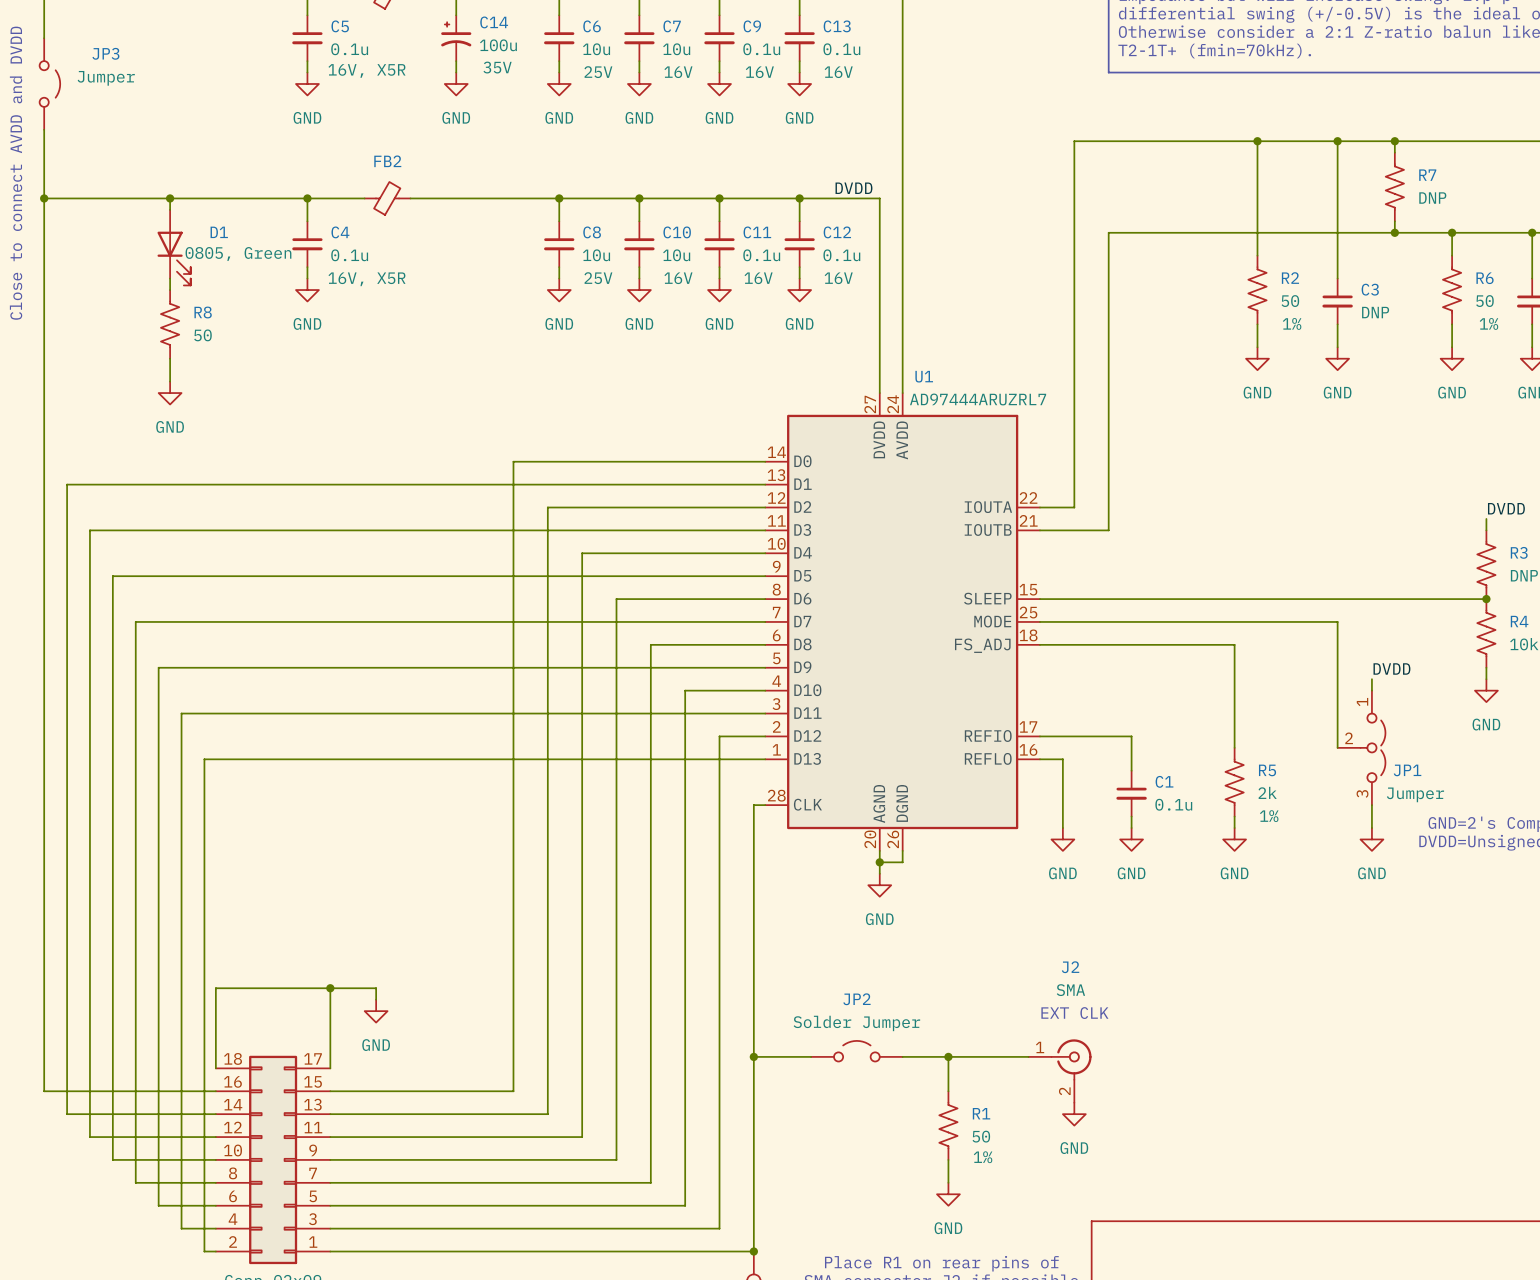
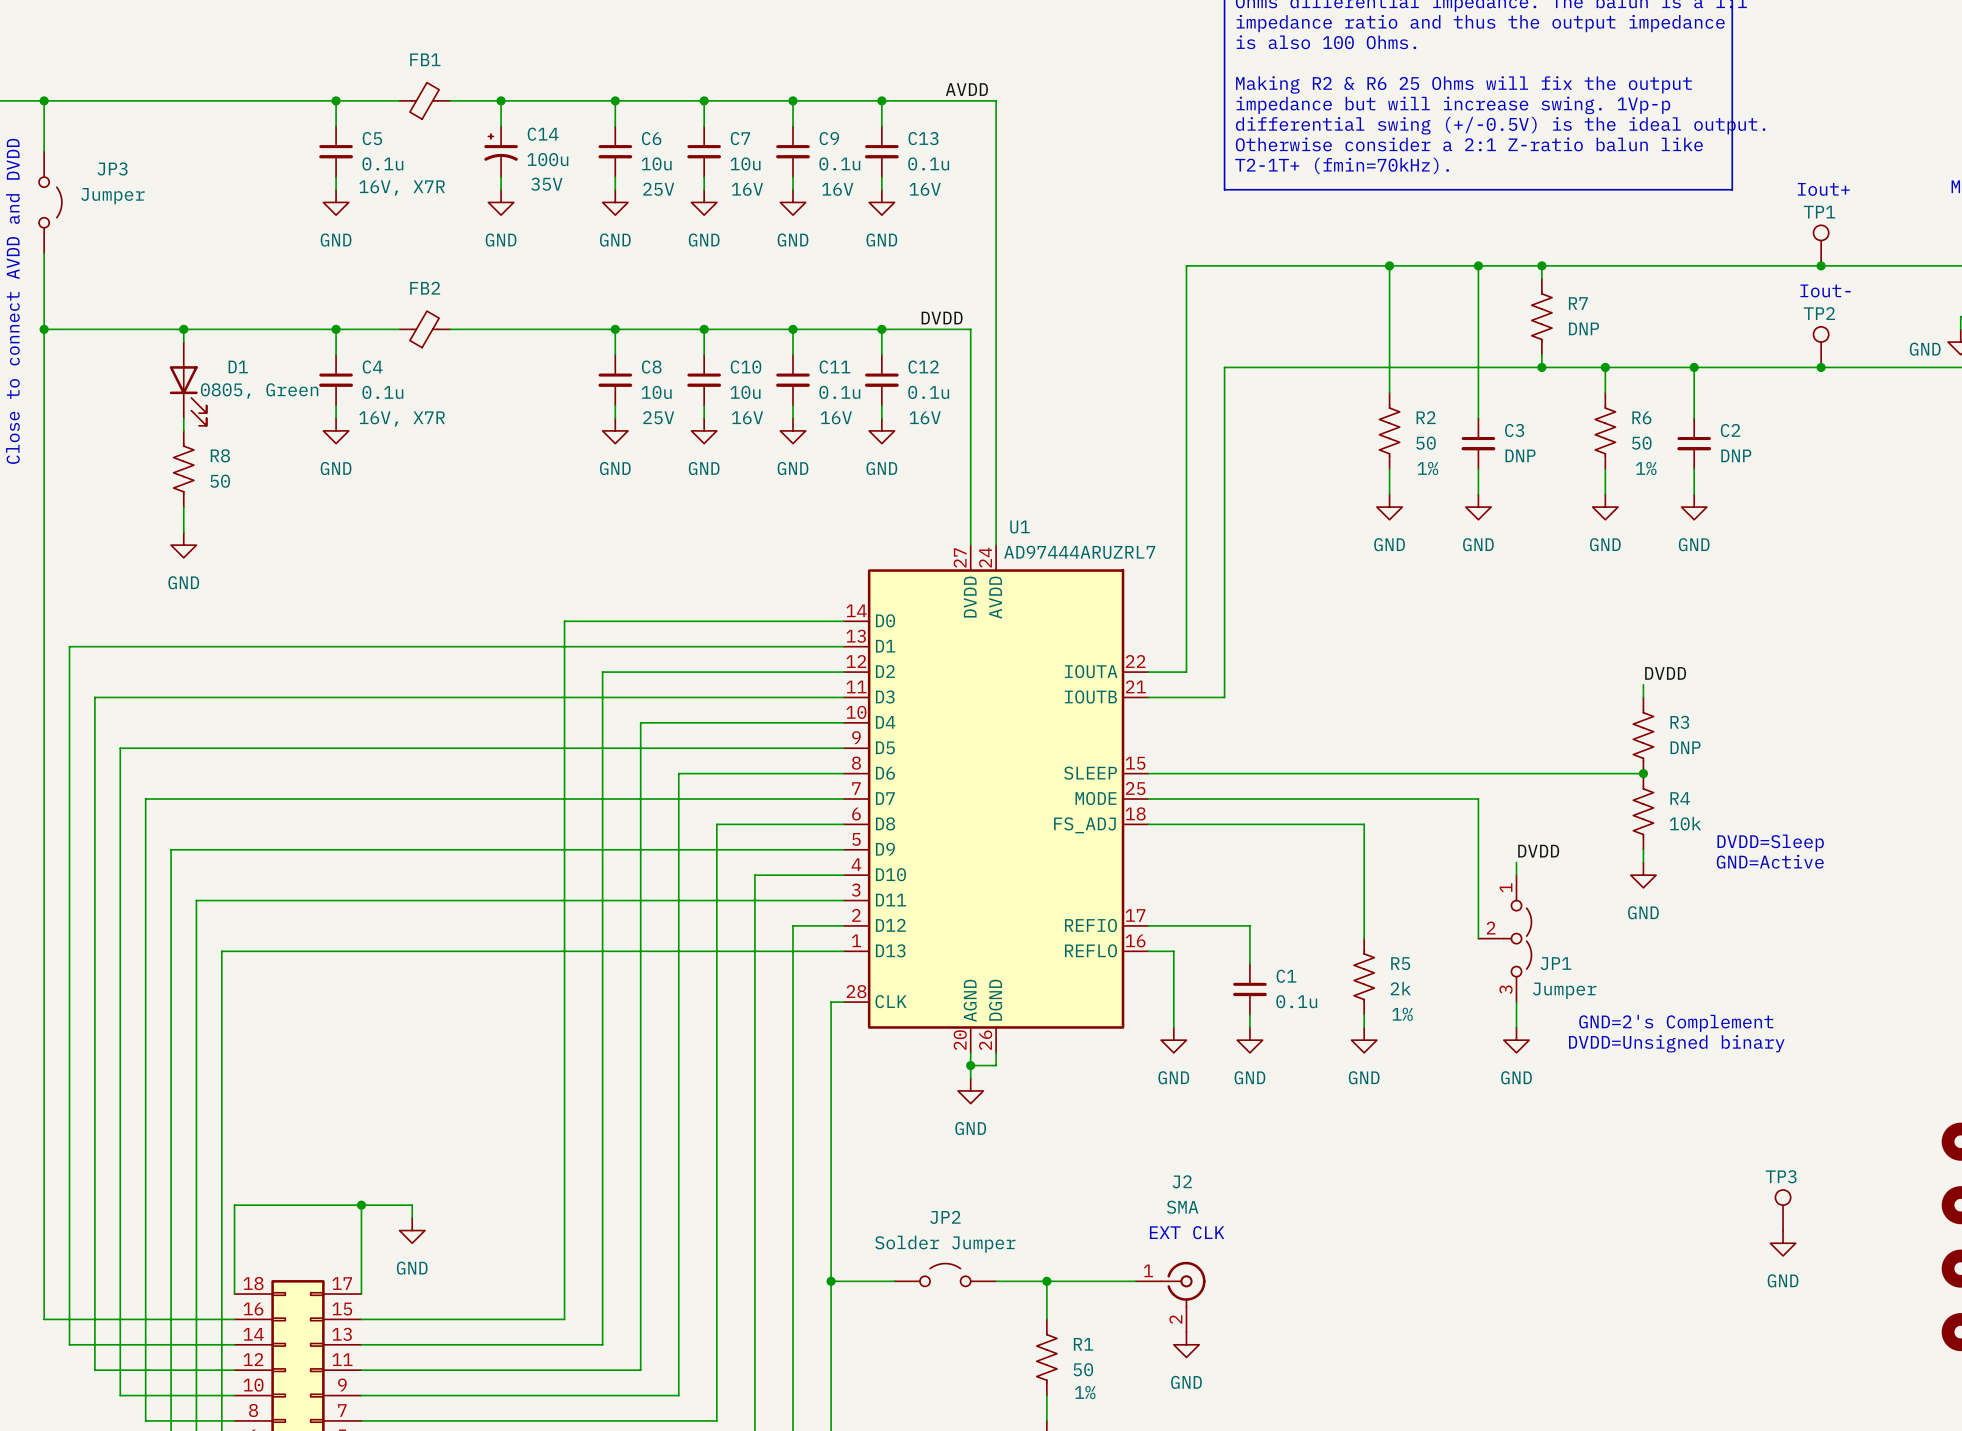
C5 text: 16V, X5R (366, 70) -> 16V, X7R (402, 188)
C4 text: 16V, X5R (366, 279) -> 16V, X7R (402, 419)

